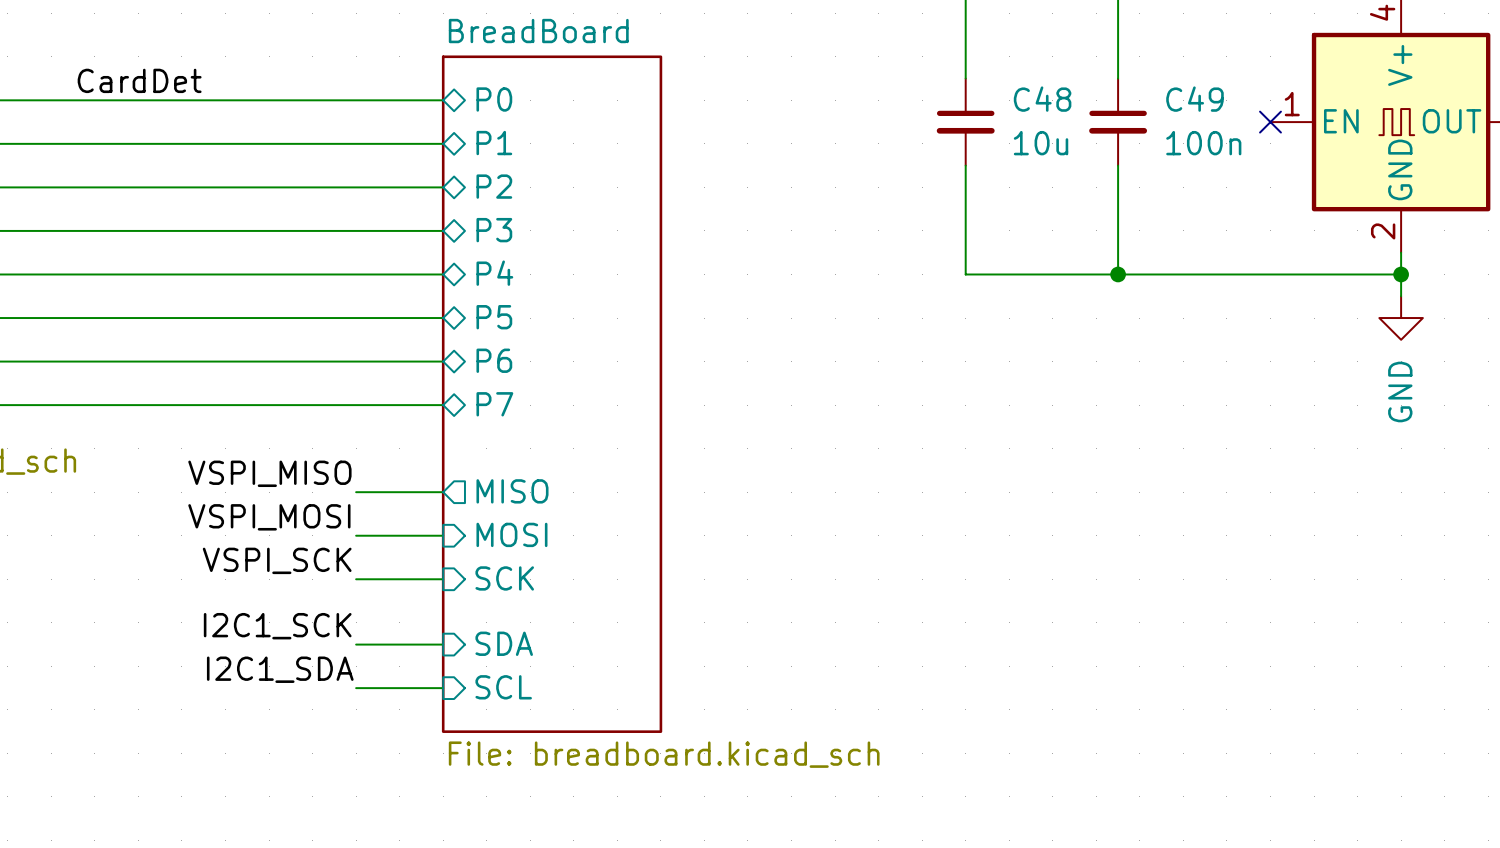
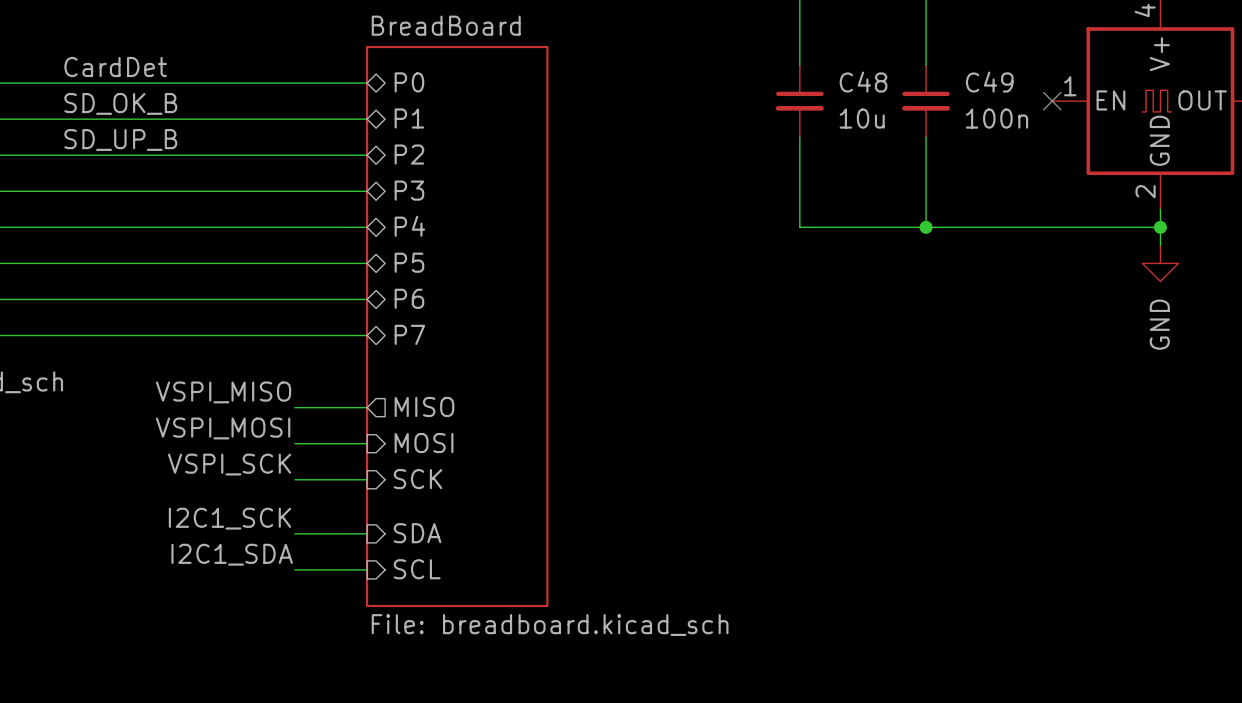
label: none -> SD_OK_B (120, 103)
label: none -> SD_UP_B (120, 139)

